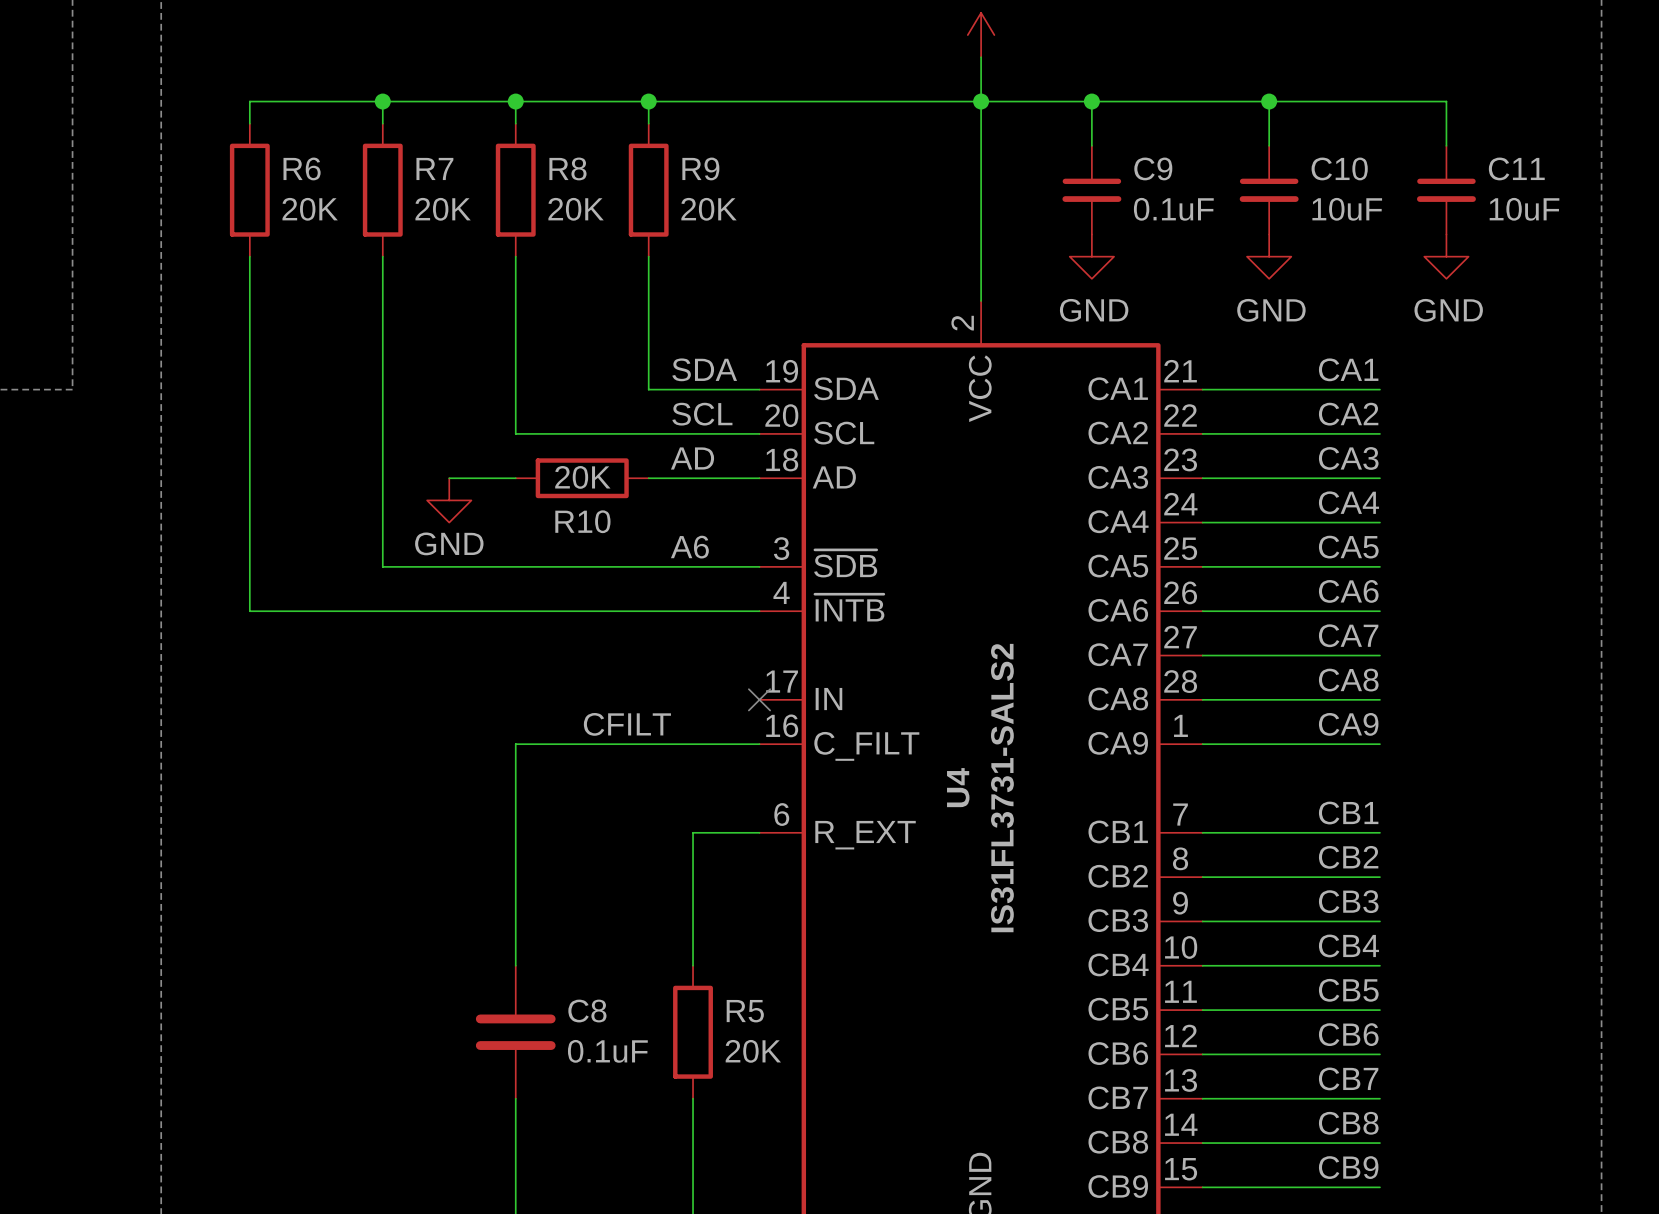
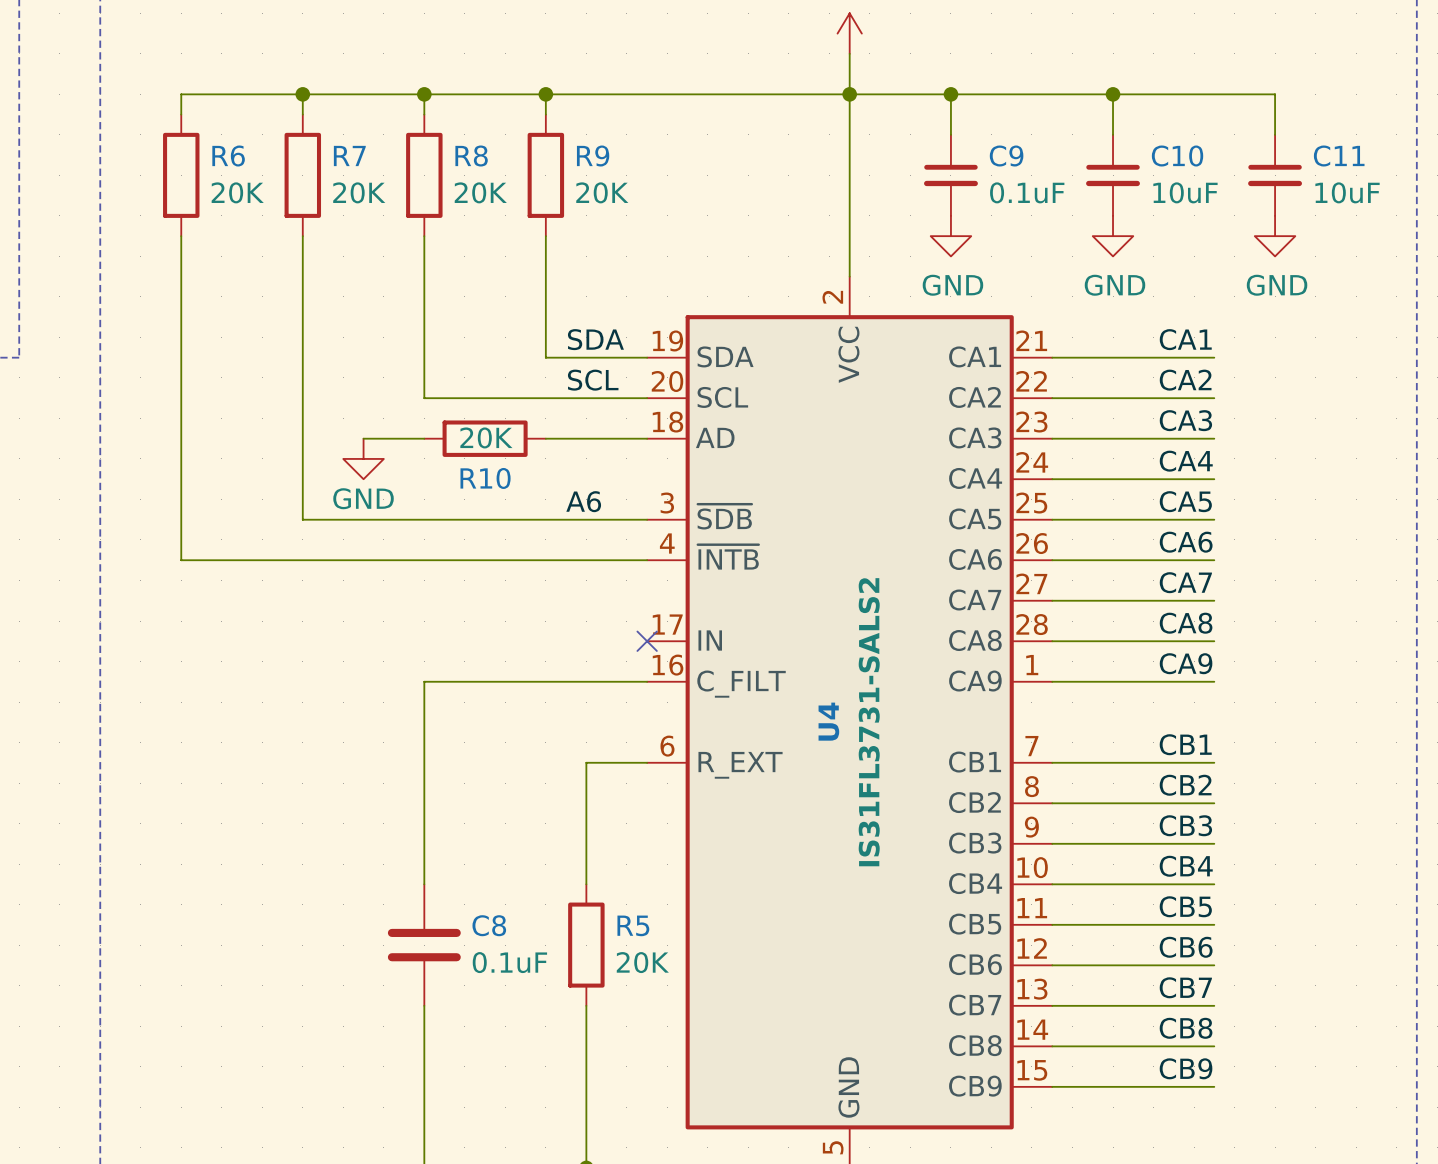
label: AD (692, 458) -> none
label: CFILT (627, 724) -> none

